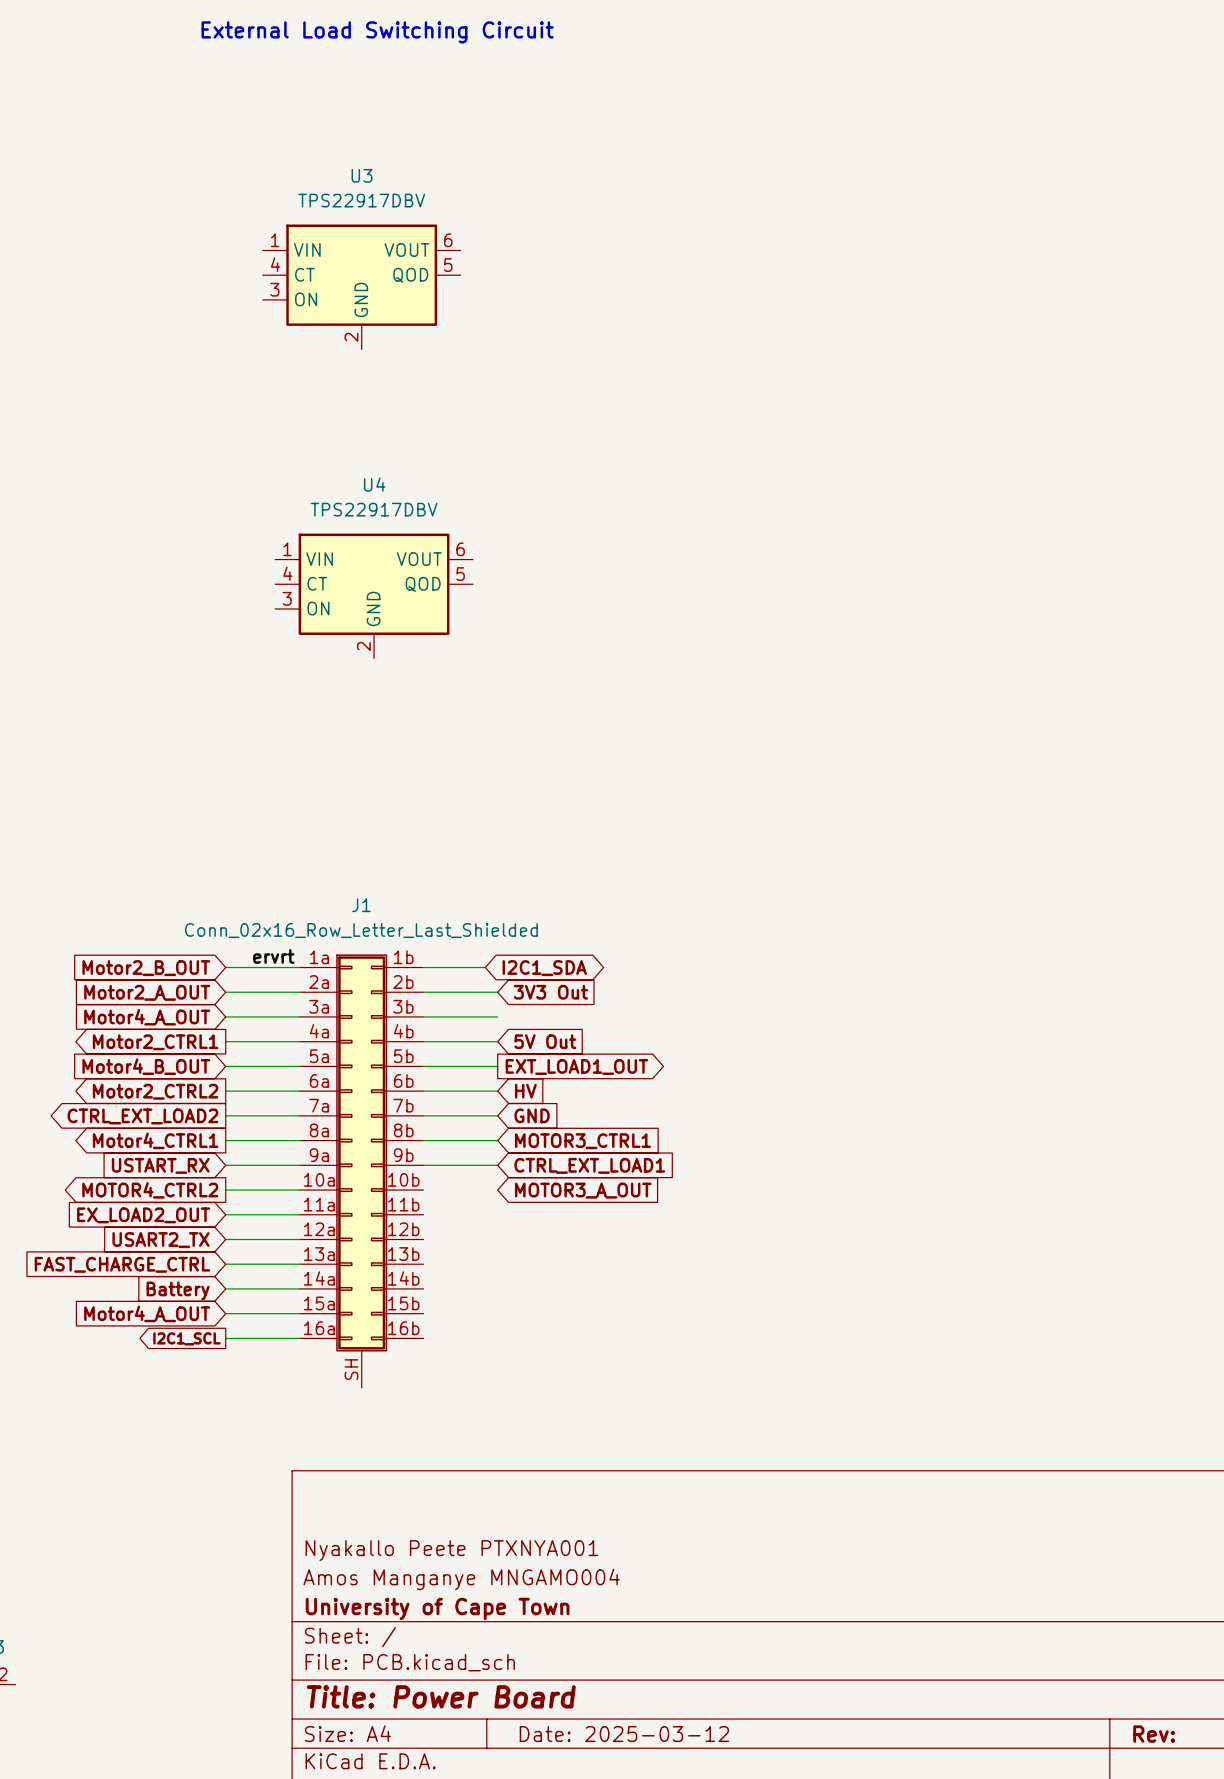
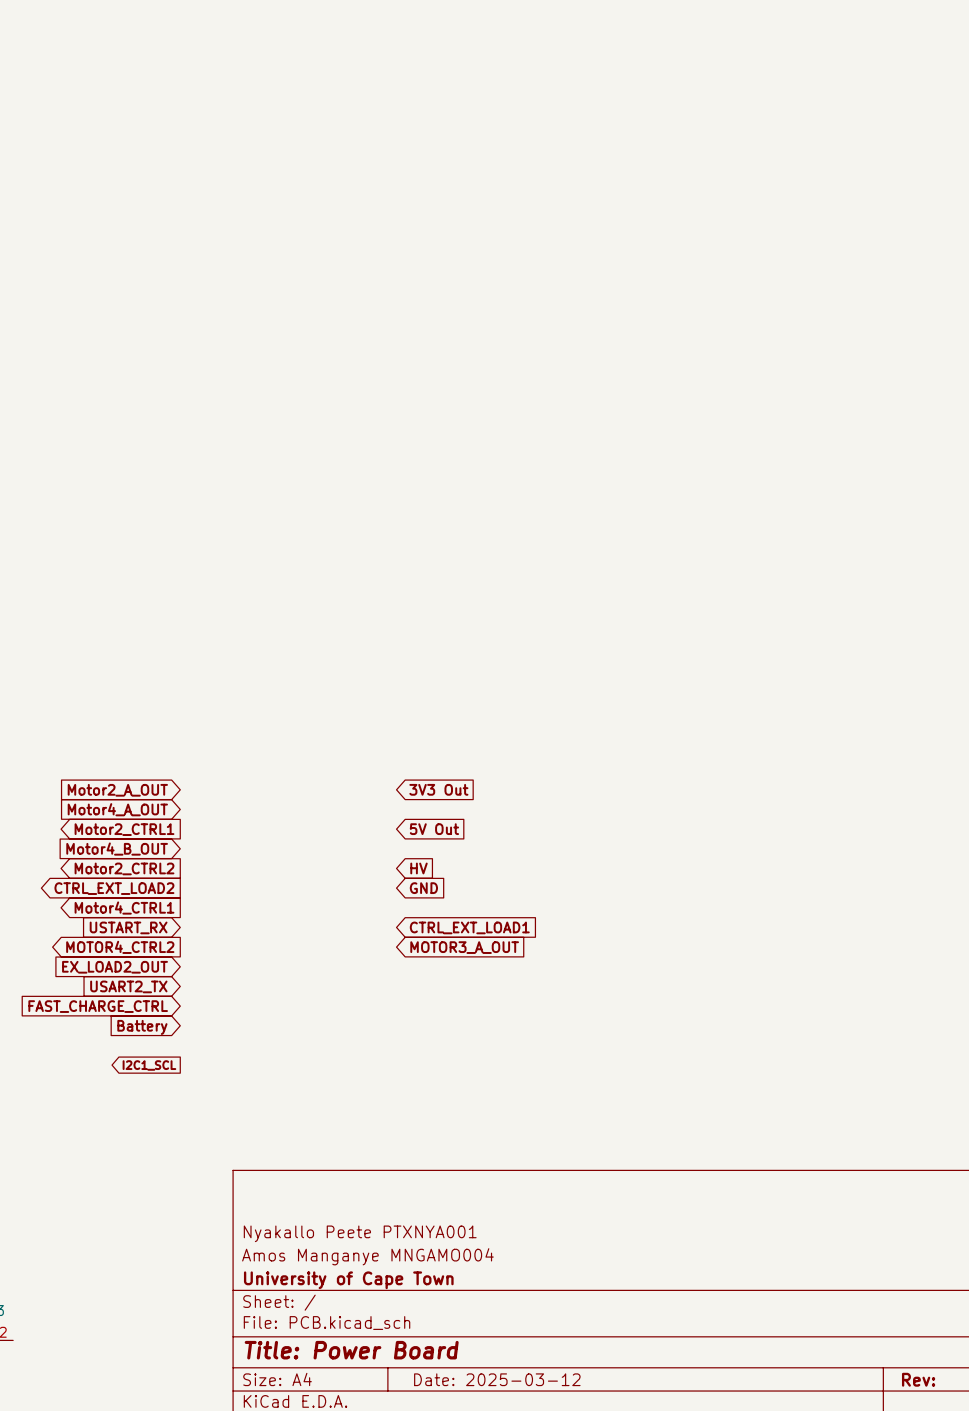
text: External Load Switching Circuit (377, 32) -> none
U3: TPS22917DBV (361, 286) -> none
U4: TPS22917DBV (374, 596) -> none
label: ervrt (273, 956) -> none
wire: (225, 967) (299, 967) -> none
wire: (423, 967) (485, 967) -> none
global label: Motor2_B_OUT (146, 968) -> none
global label: I2C1_SDA (544, 968) -> none
wire: (225, 992) (299, 992) -> none
wire: (423, 992) (497, 992) -> none
wire: (225, 1016) (299, 1016) -> none
wire: (423, 1016) (497, 1016) -> none
wire: (225, 1041) (299, 1041) -> none
wire: (423, 1041) (497, 1041) -> none
wire: (225, 1066) (299, 1066) -> none
wire: (423, 1066) (497, 1066) -> none
global label: EXT_LOAD1_OUT (576, 1067) -> none
wire: (225, 1091) (299, 1091) -> none
wire: (423, 1091) (497, 1091) -> none
wire: (225, 1115) (299, 1115) -> none
wire: (423, 1115) (497, 1115) -> none
wire: (225, 1140) (299, 1140) -> none
wire: (423, 1140) (497, 1140) -> none
global label: MOTOR3_CTRL1 (582, 1141) -> none
wire: (225, 1165) (299, 1165) -> none
wire: (423, 1165) (497, 1165) -> none
J1: Conn_02x16_Row_Letter_Last_Shielded (361, 1171) -> none
wire: (225, 1190) (299, 1190) -> none
wire: (225, 1214) (299, 1214) -> none
wire: (225, 1239) (299, 1239) -> none
wire: (225, 1264) (299, 1264) -> none
wire: (225, 1288) (299, 1288) -> none
global label: Motor4_A_OUT (147, 1313) -> none
wire: (225, 1313) (299, 1313) -> none
wire: (225, 1338) (299, 1338) -> none

